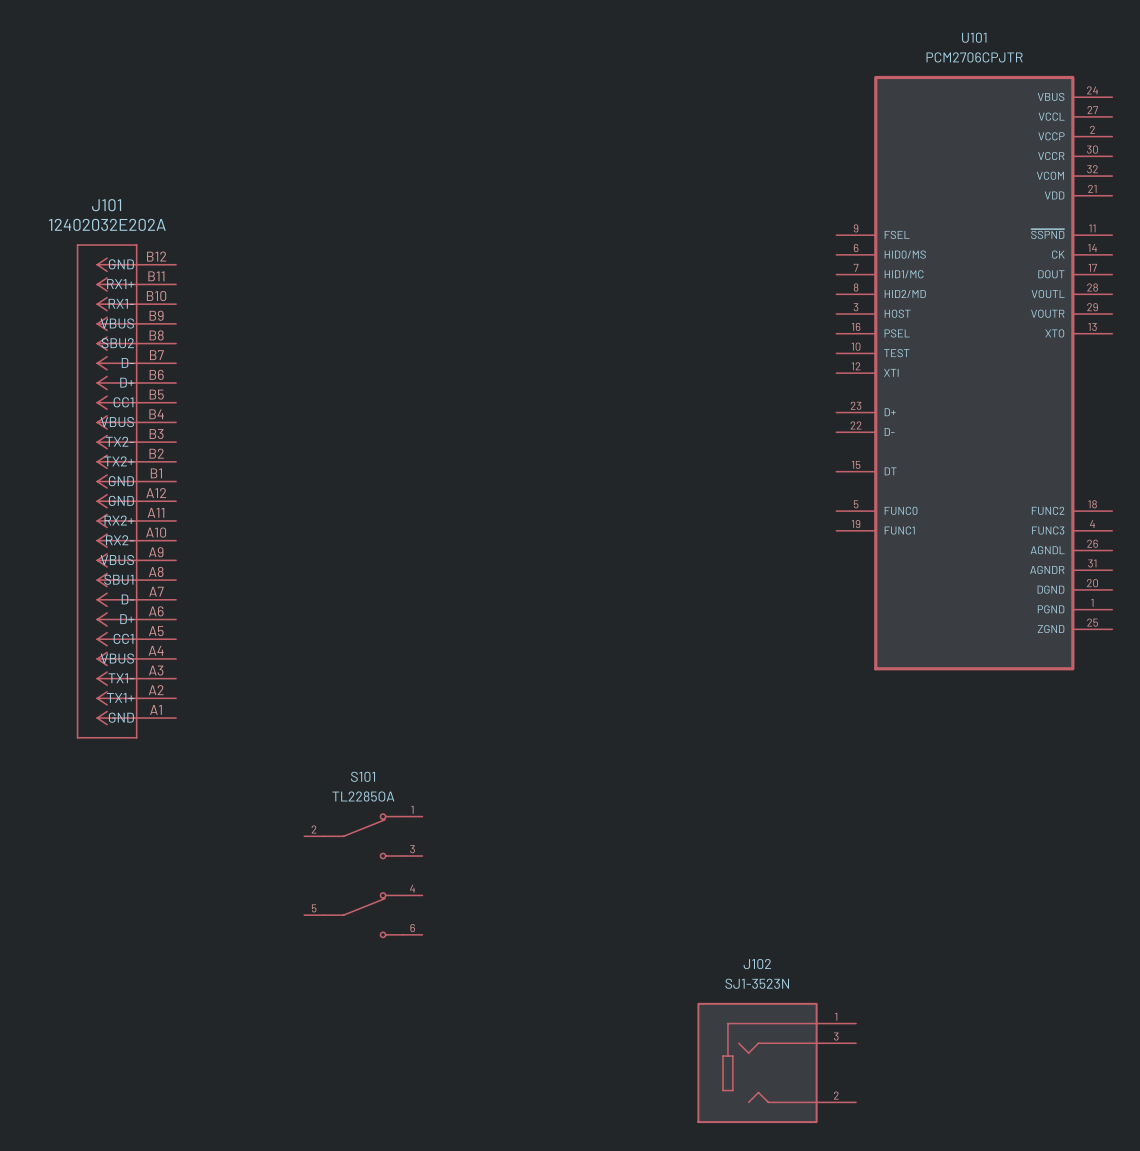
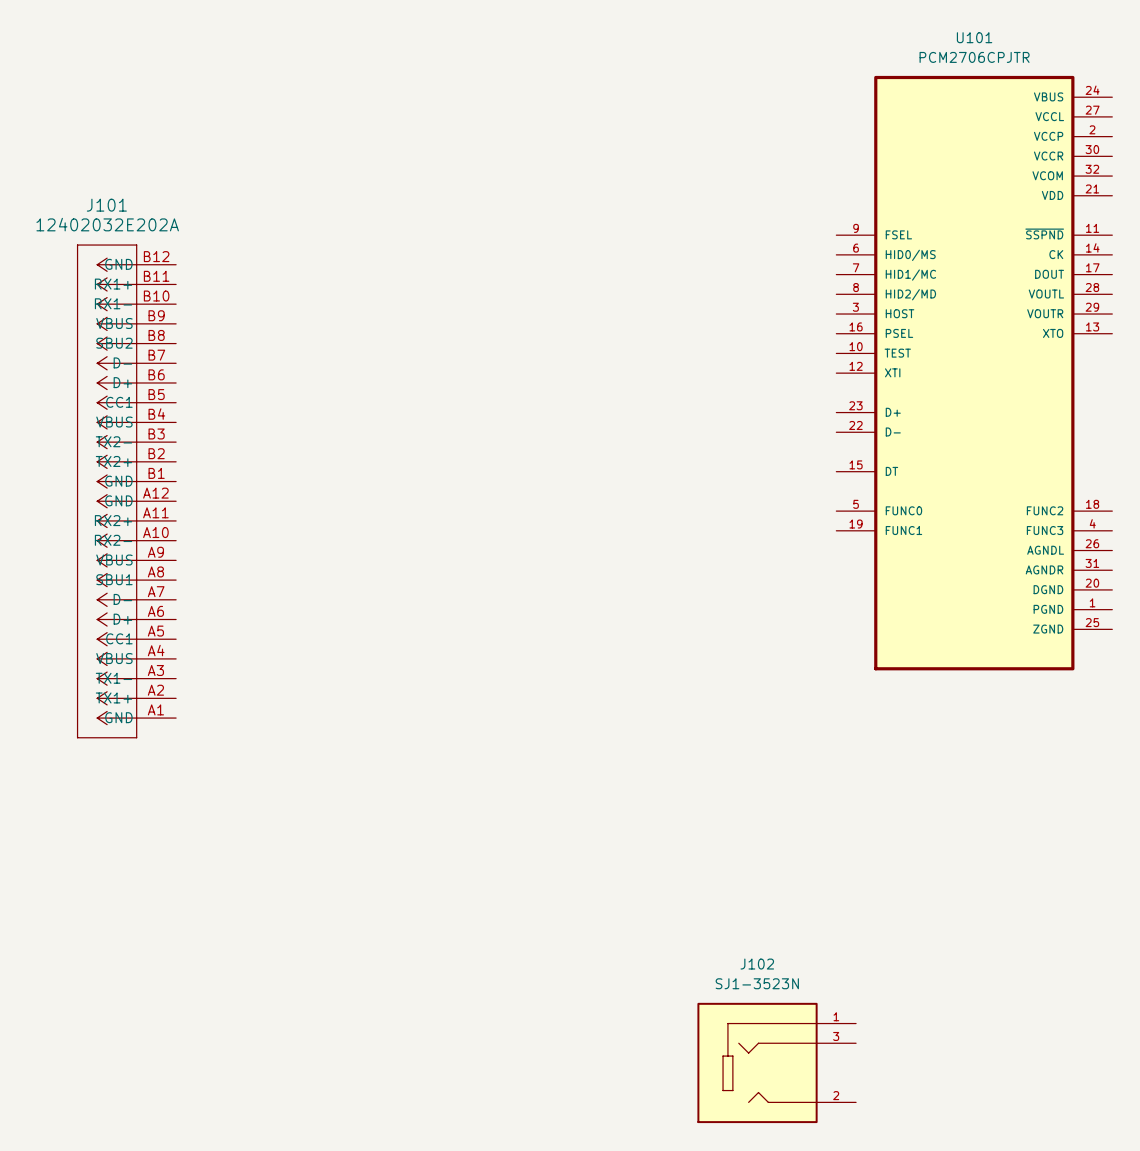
S101: TL2285OA (363, 875) -> none

